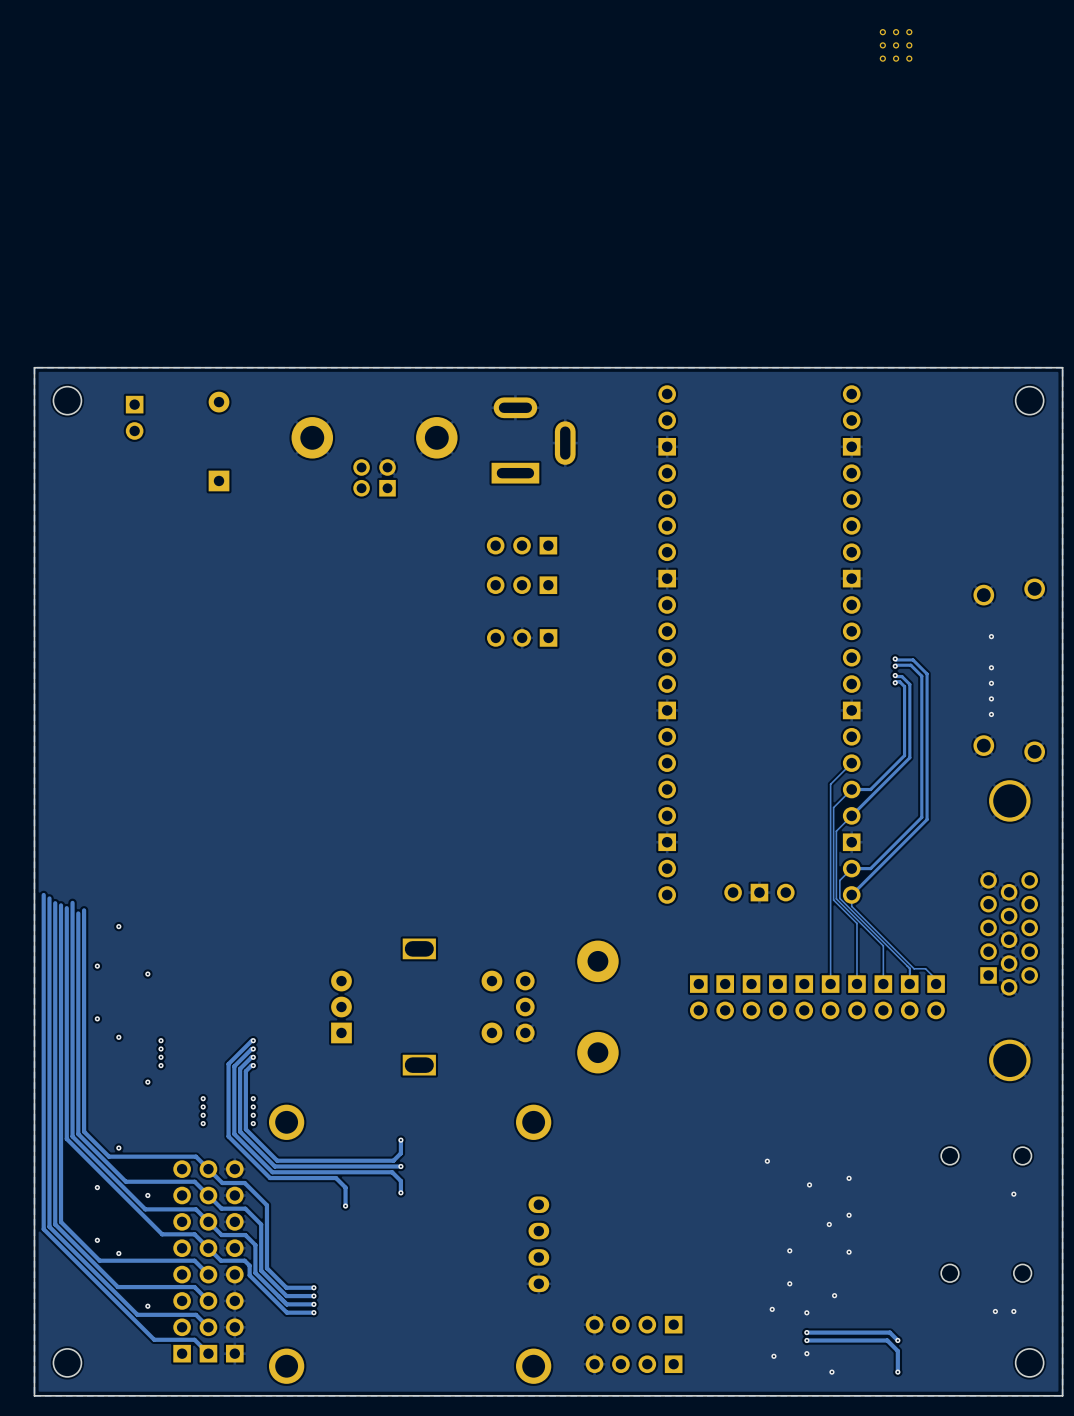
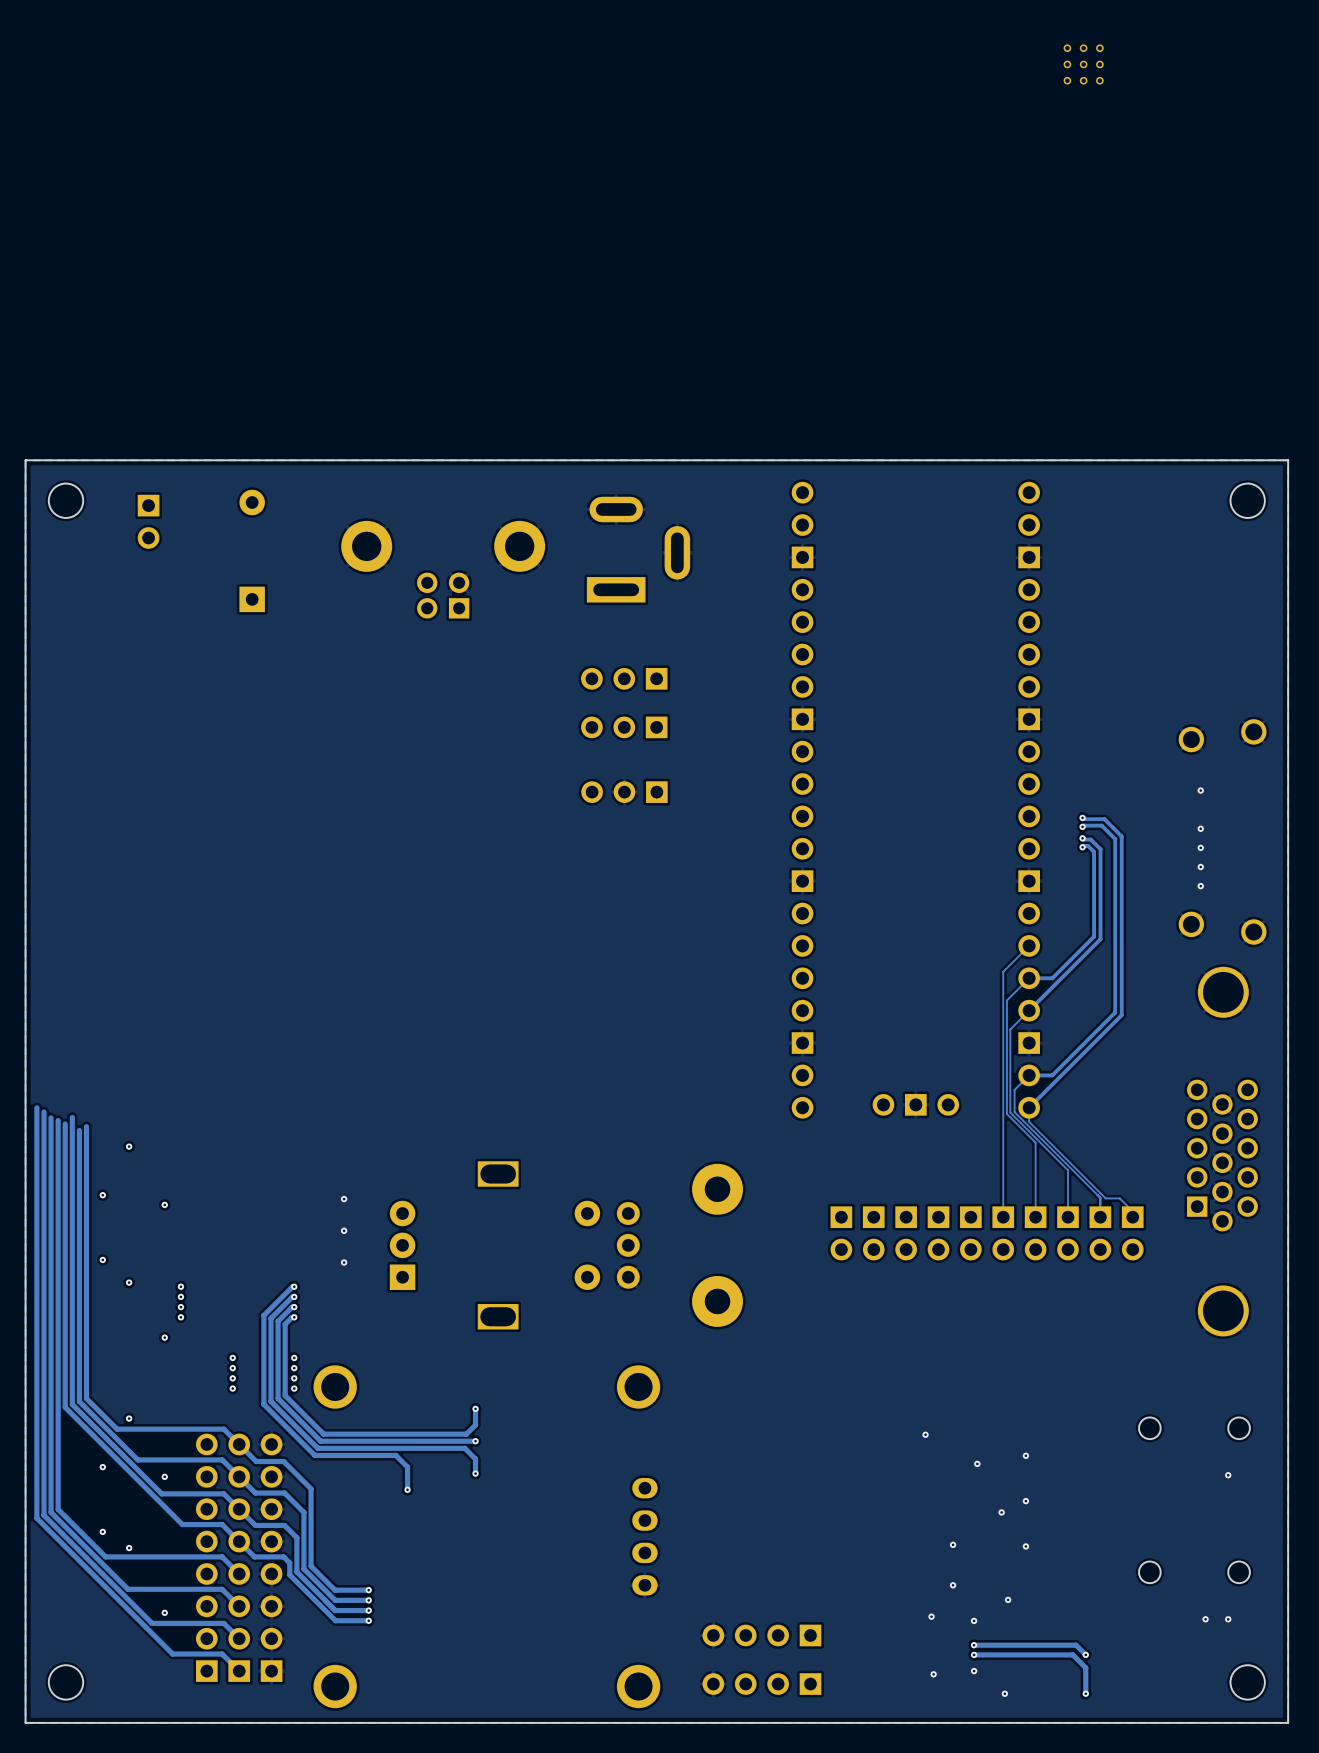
via: none -> (344, 1199)
via: none -> (344, 1230)
via: none -> (344, 1262)

